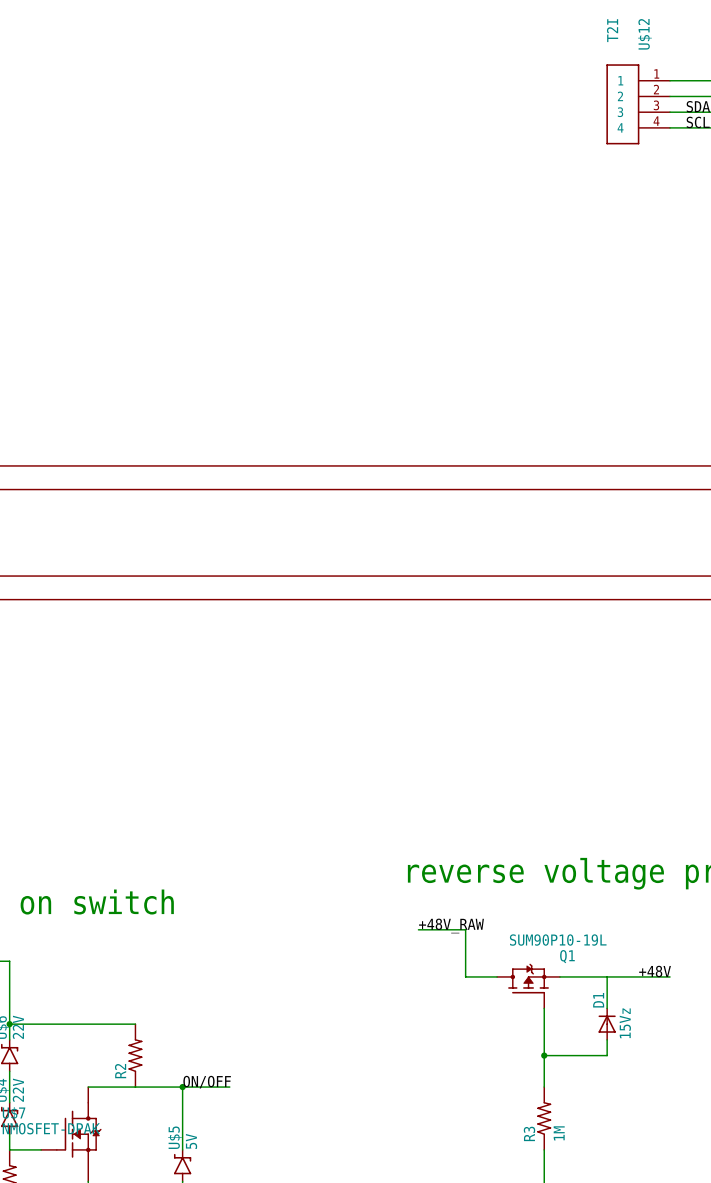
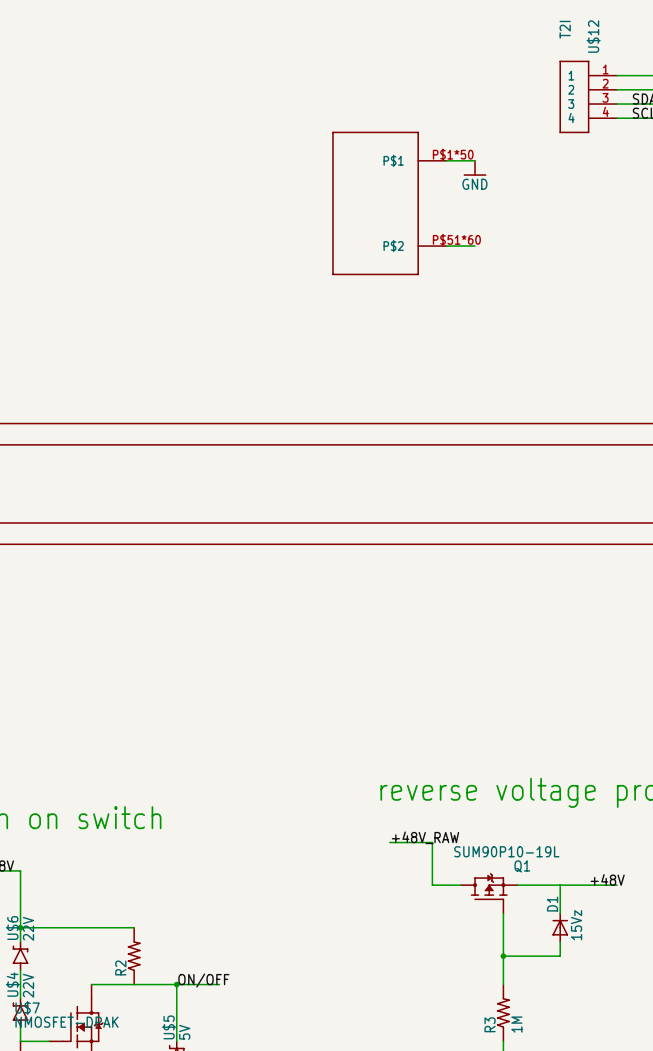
wire: none -> (446, 160) (475, 160)
power symbol: none -> GND (475, 168)
part: none -> (389, 203)
wire: none -> (446, 246) (475, 246)

